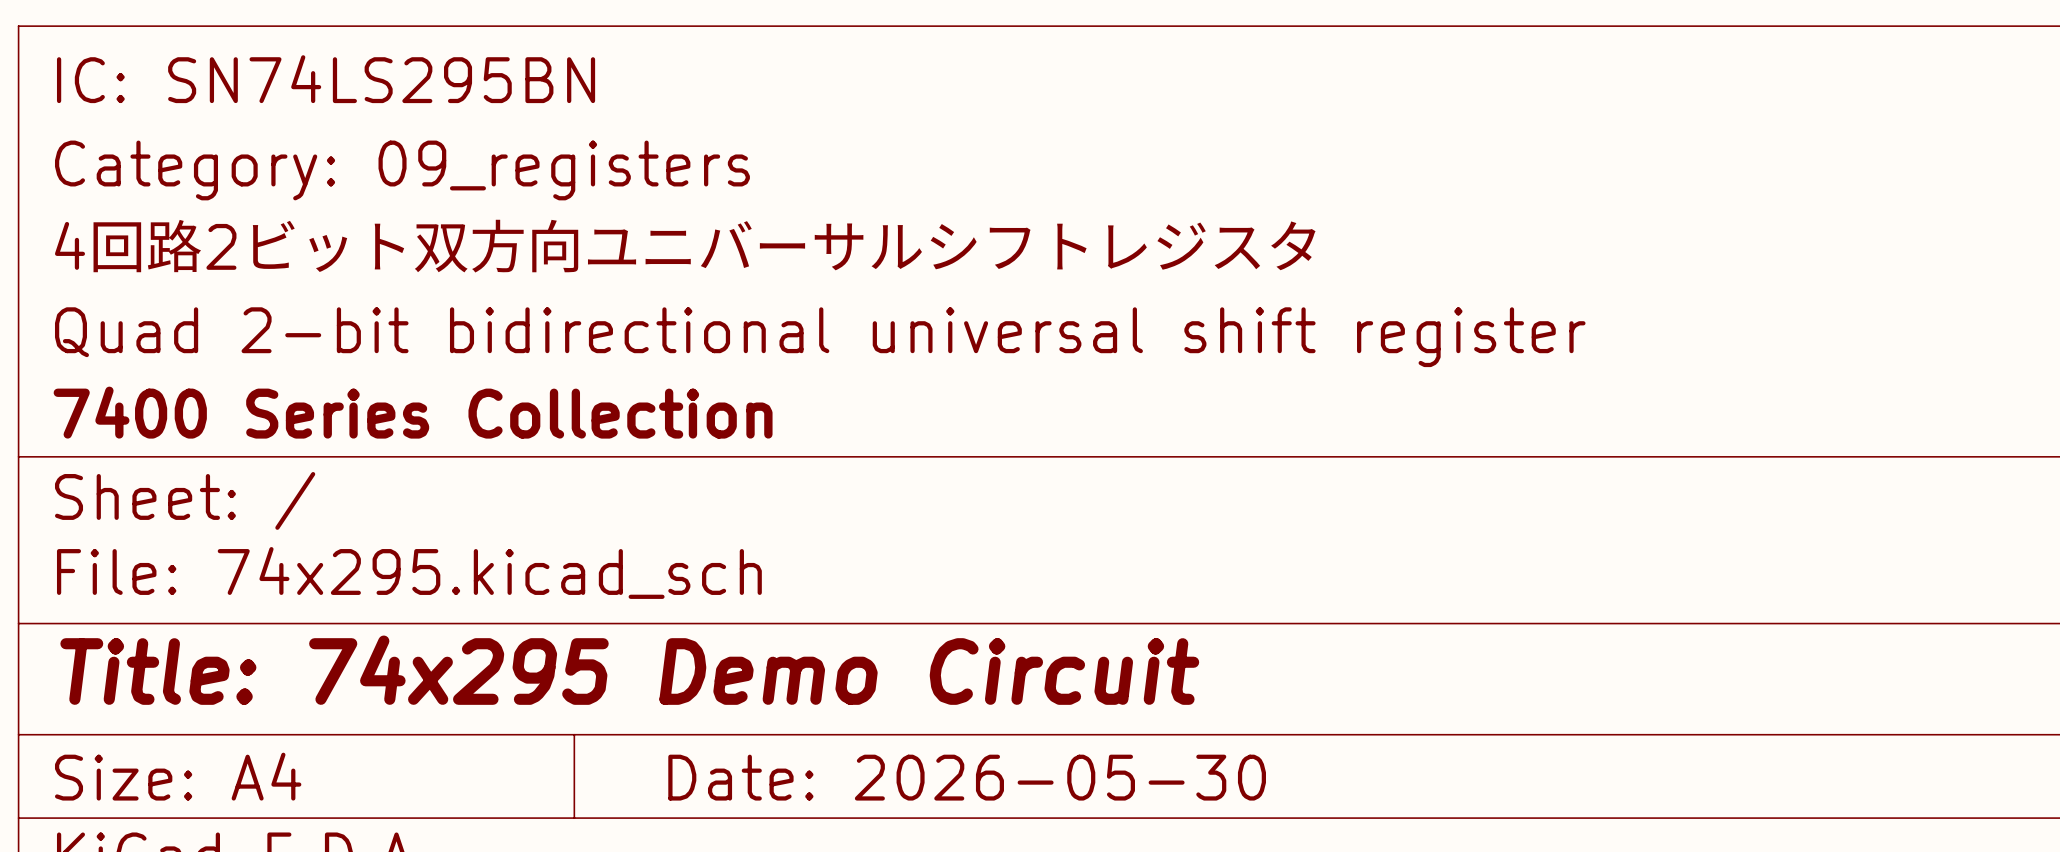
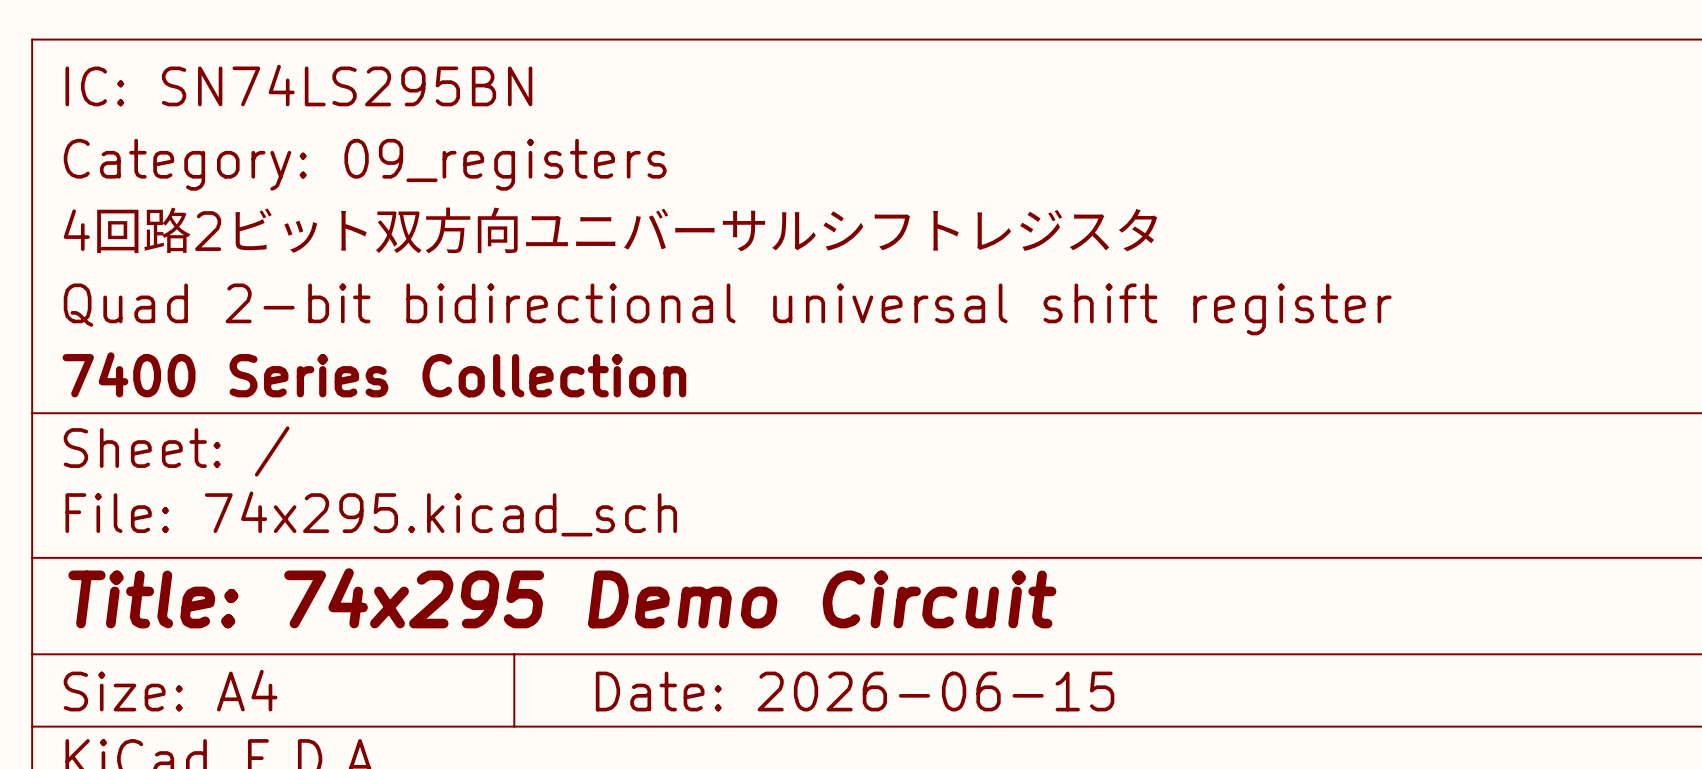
title block: Date: 2026-05-30 (967, 777) -> Date: 2026-06-15 (855, 691)

